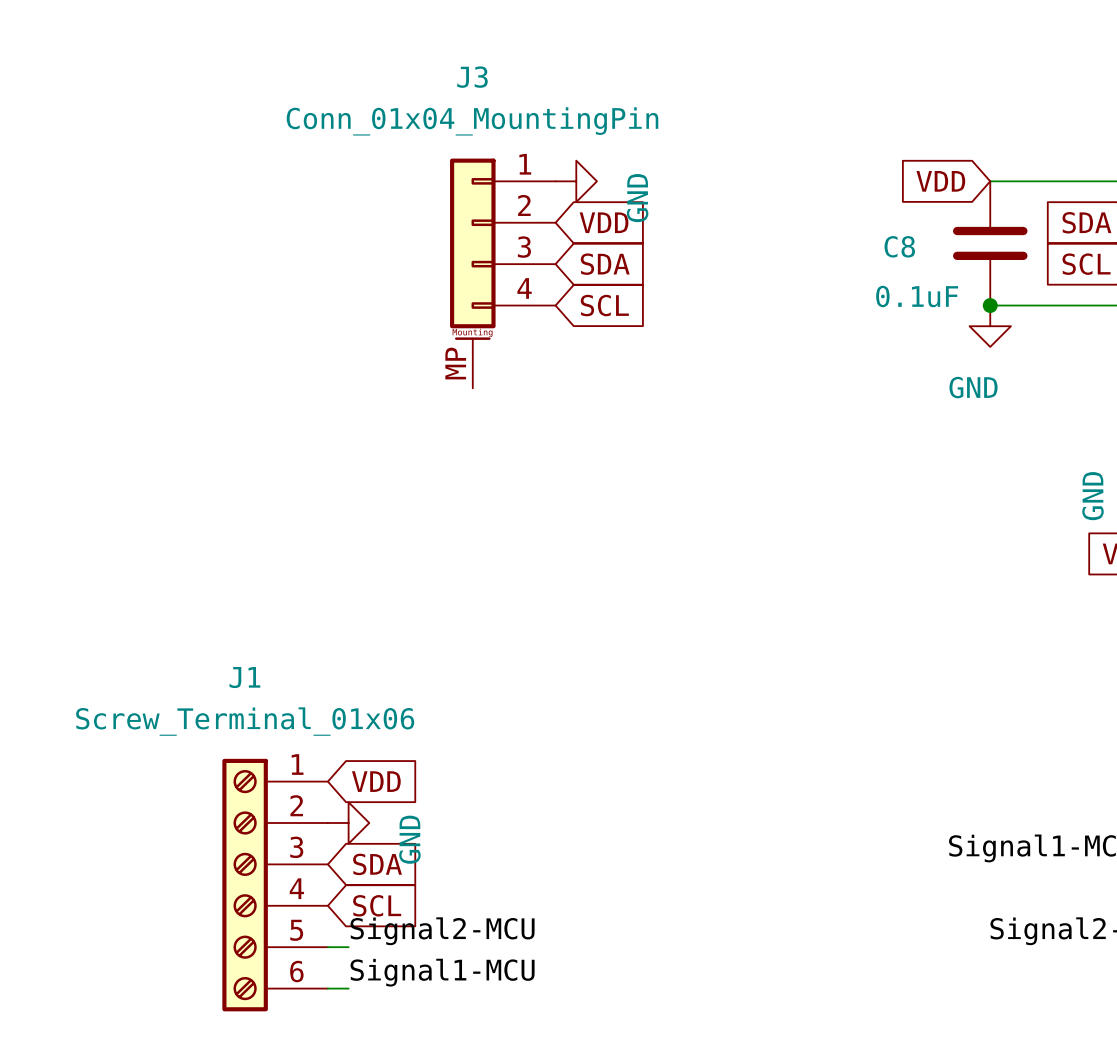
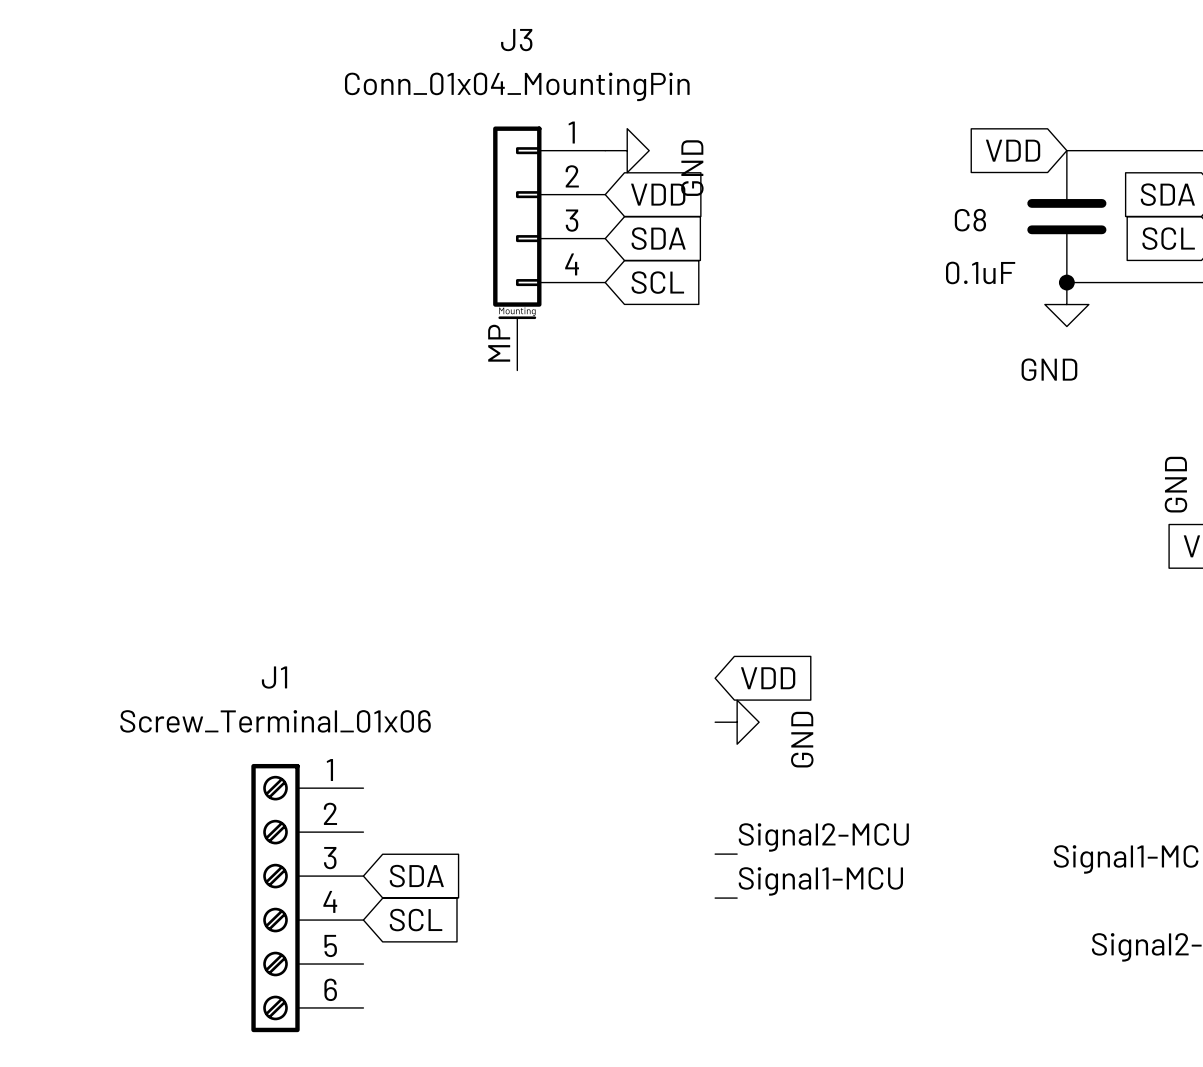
global label position: VDD (376, 781) -> VDD (768, 678)
power symbol position: GND (348, 822) -> GND (737, 722)
label position: Signal2-MCU (442, 931) -> Signal2-MCU (823, 837)
wire: (327, 947) (348, 947) -> (715, 854) (737, 854)
label position: Signal1-MCU (442, 972) -> Signal1-MCU (820, 881)
wire: (327, 988) (348, 988) -> (715, 898) (737, 898)

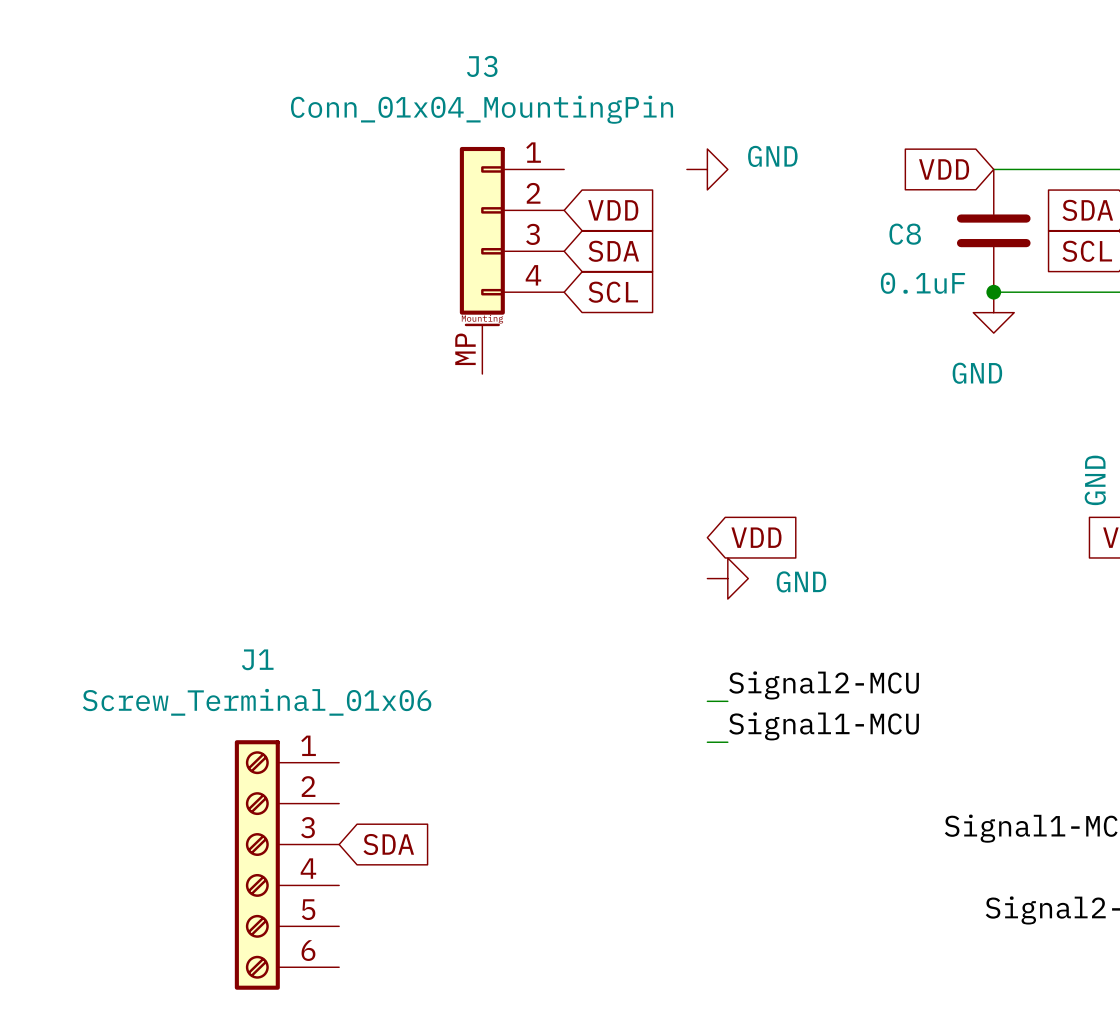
power symbol position: GND (627, 150) -> GND (707, 169)
power symbol text rotation: 0° (692, 168) -> 90° clockwise (772, 156)
global label position: VDD (768, 678) -> VDD (756, 537)
power symbol position: GND (737, 722) -> GND (727, 578)
power symbol text rotation: 0° (802, 739) -> 90° clockwise (801, 581)
label position: Signal2-MCU (823, 837) -> Signal2-MCU (824, 685)
wire: (715, 854) (737, 854) -> (707, 701) (727, 701)
label position: Signal1-MCU (820, 881) -> Signal1-MCU (824, 726)
wire: (715, 898) (737, 898) -> (707, 742) (727, 742)
global label: SCL (416, 920) -> none

